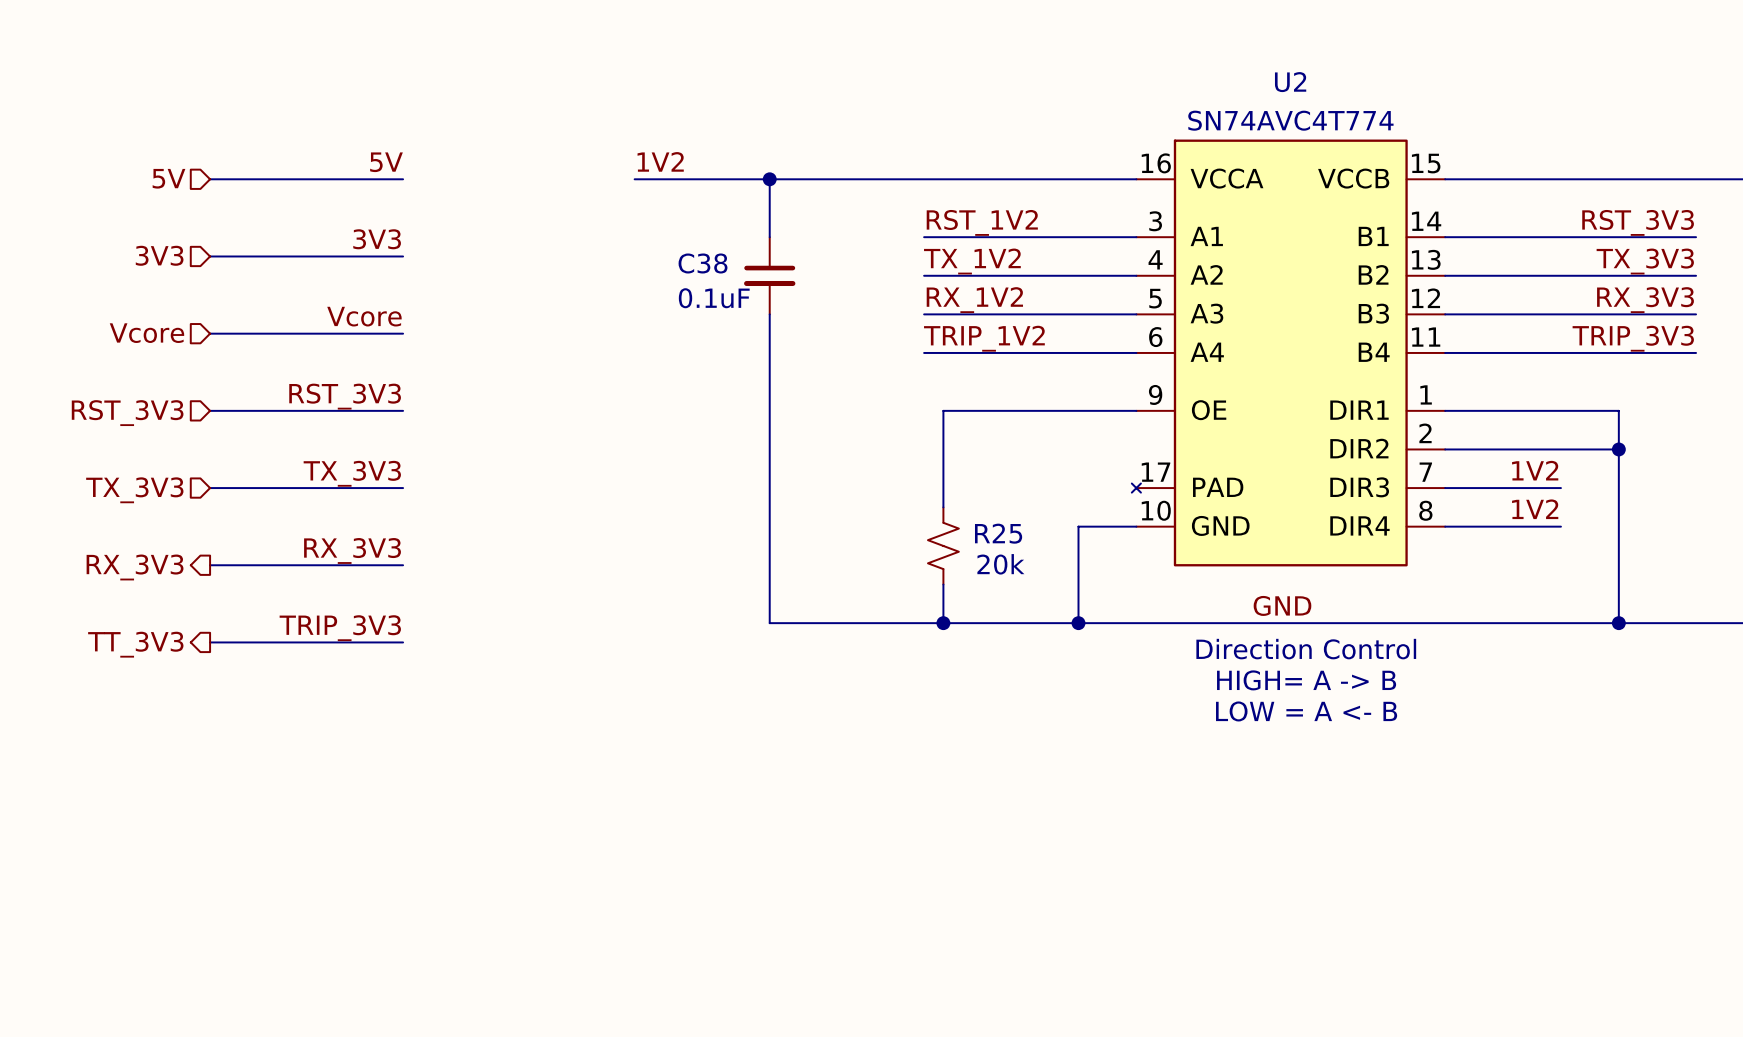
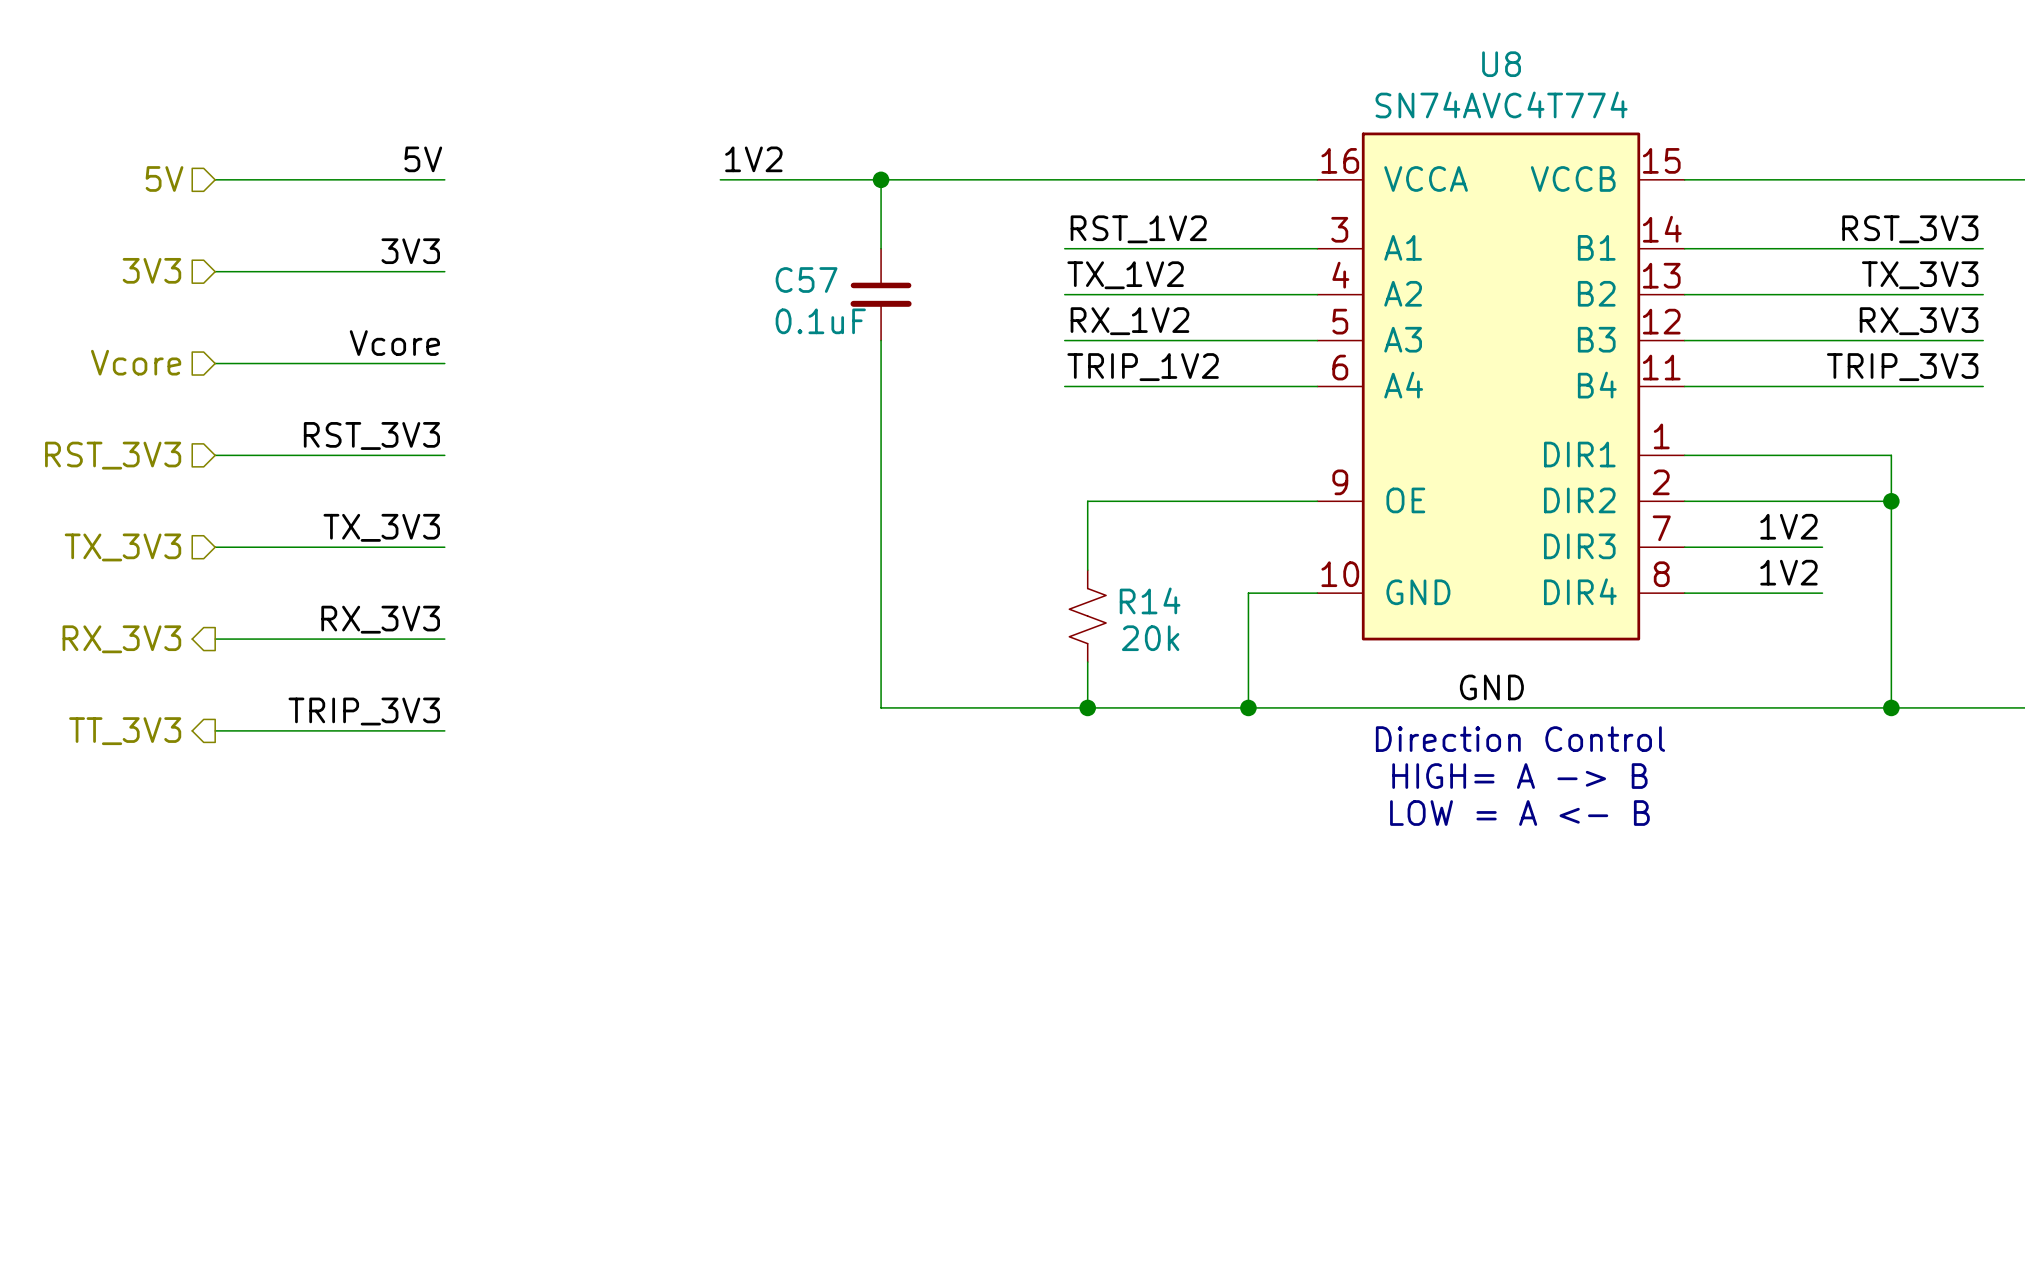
C38 name: C38 (703, 263) -> C57 (806, 280)
U2: SN74AVC4T774 (1288, 352) -> none
U8: none -> SN74AVC4T774 (1501, 386)
wire: (1136, 410) (943, 410) (943, 449) -> (1317, 501) (1087, 501)
R25 name: R25 (998, 533) -> R14 (1150, 600)

